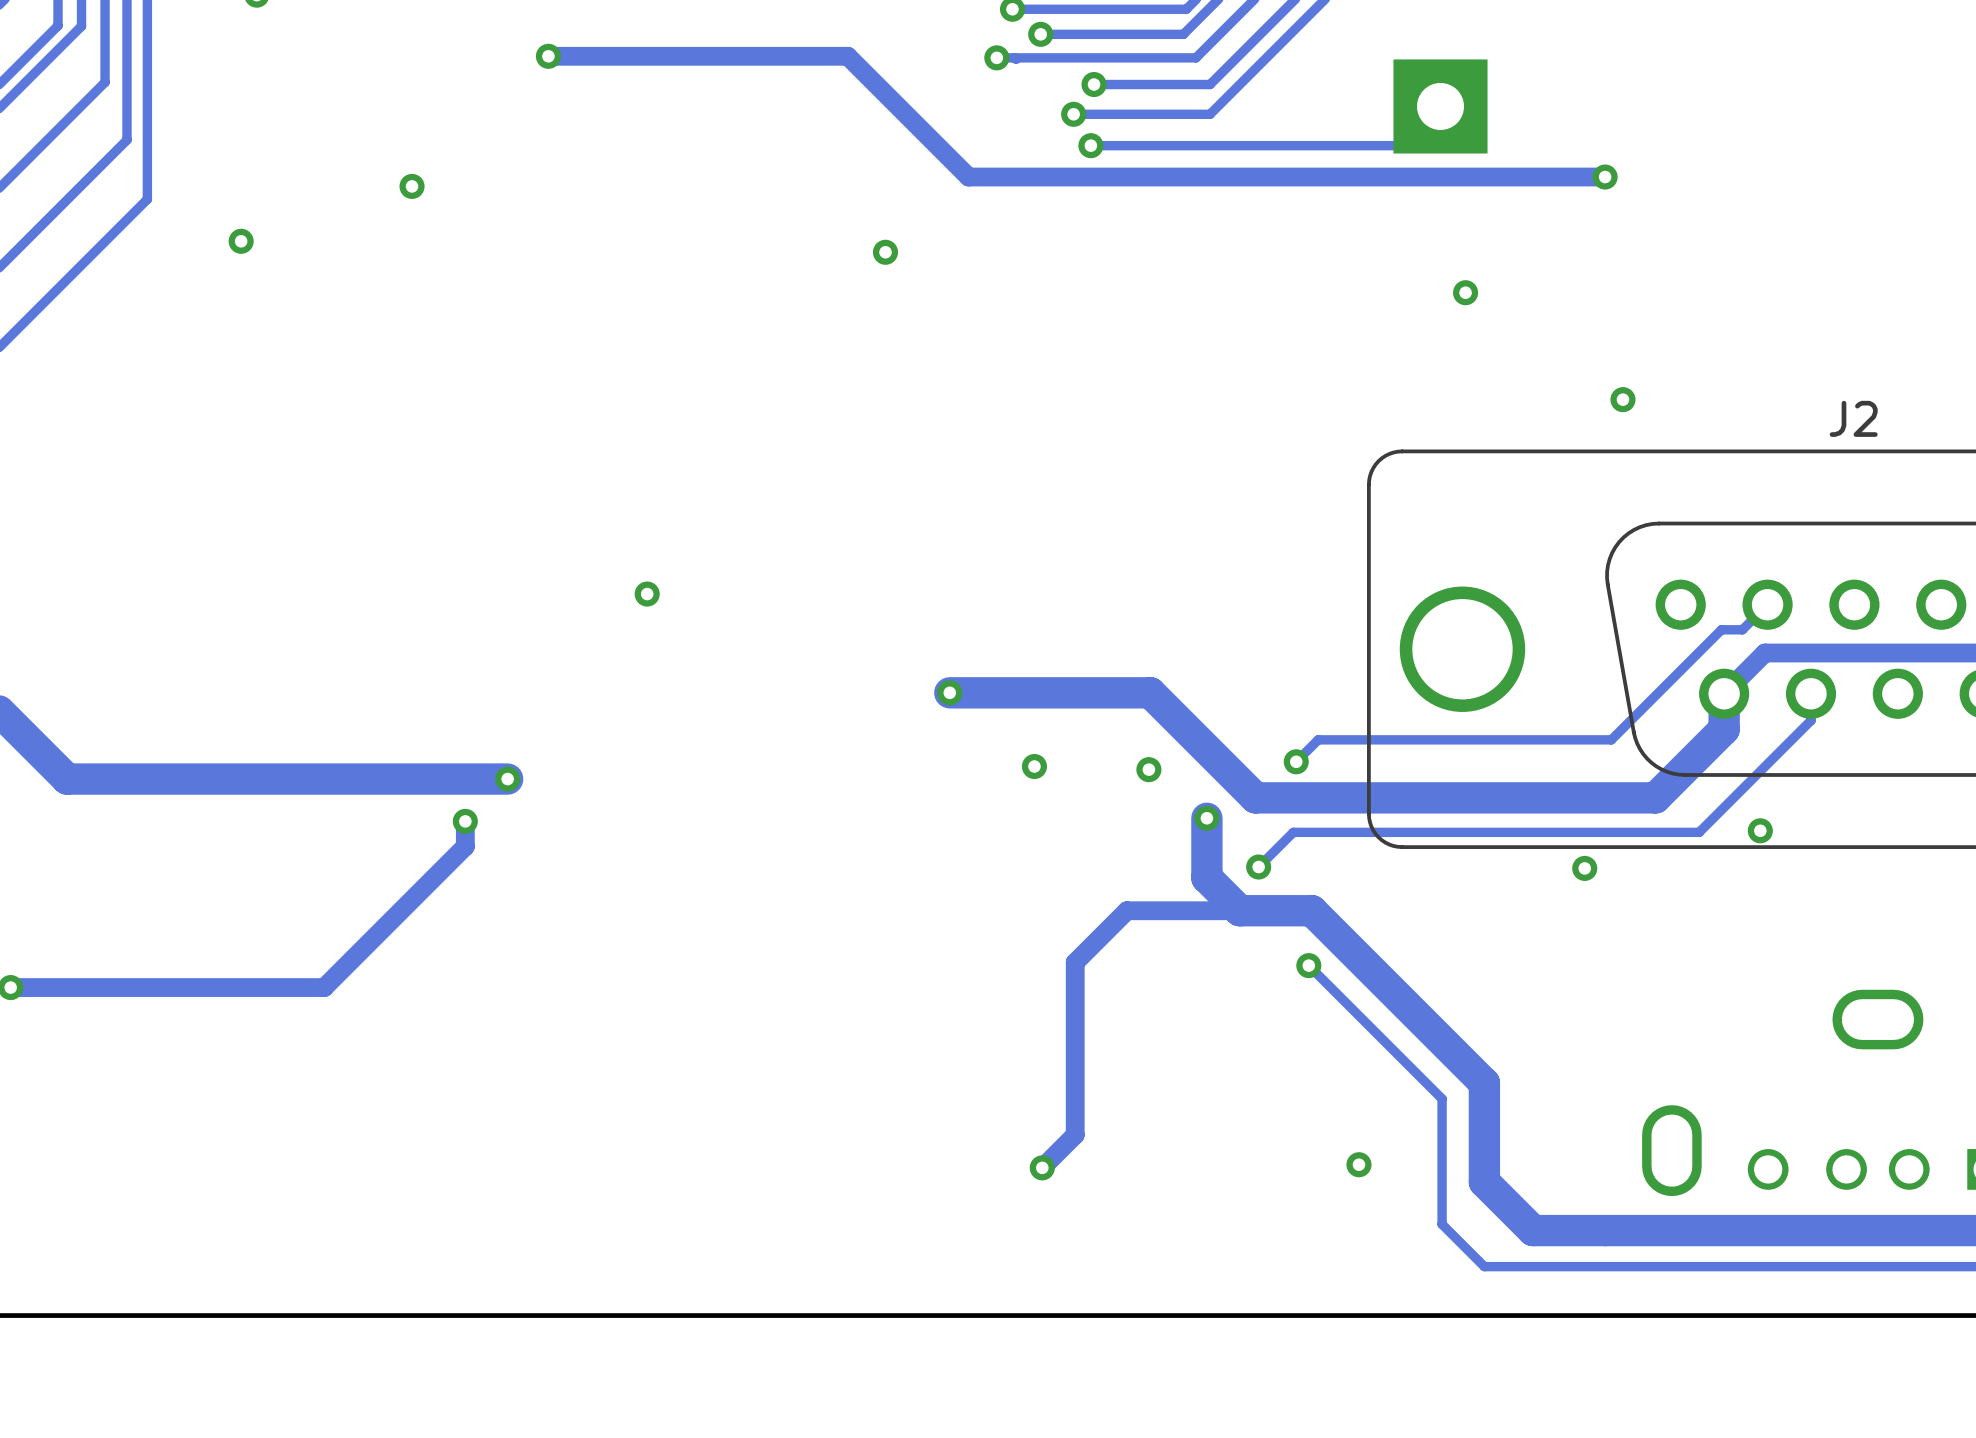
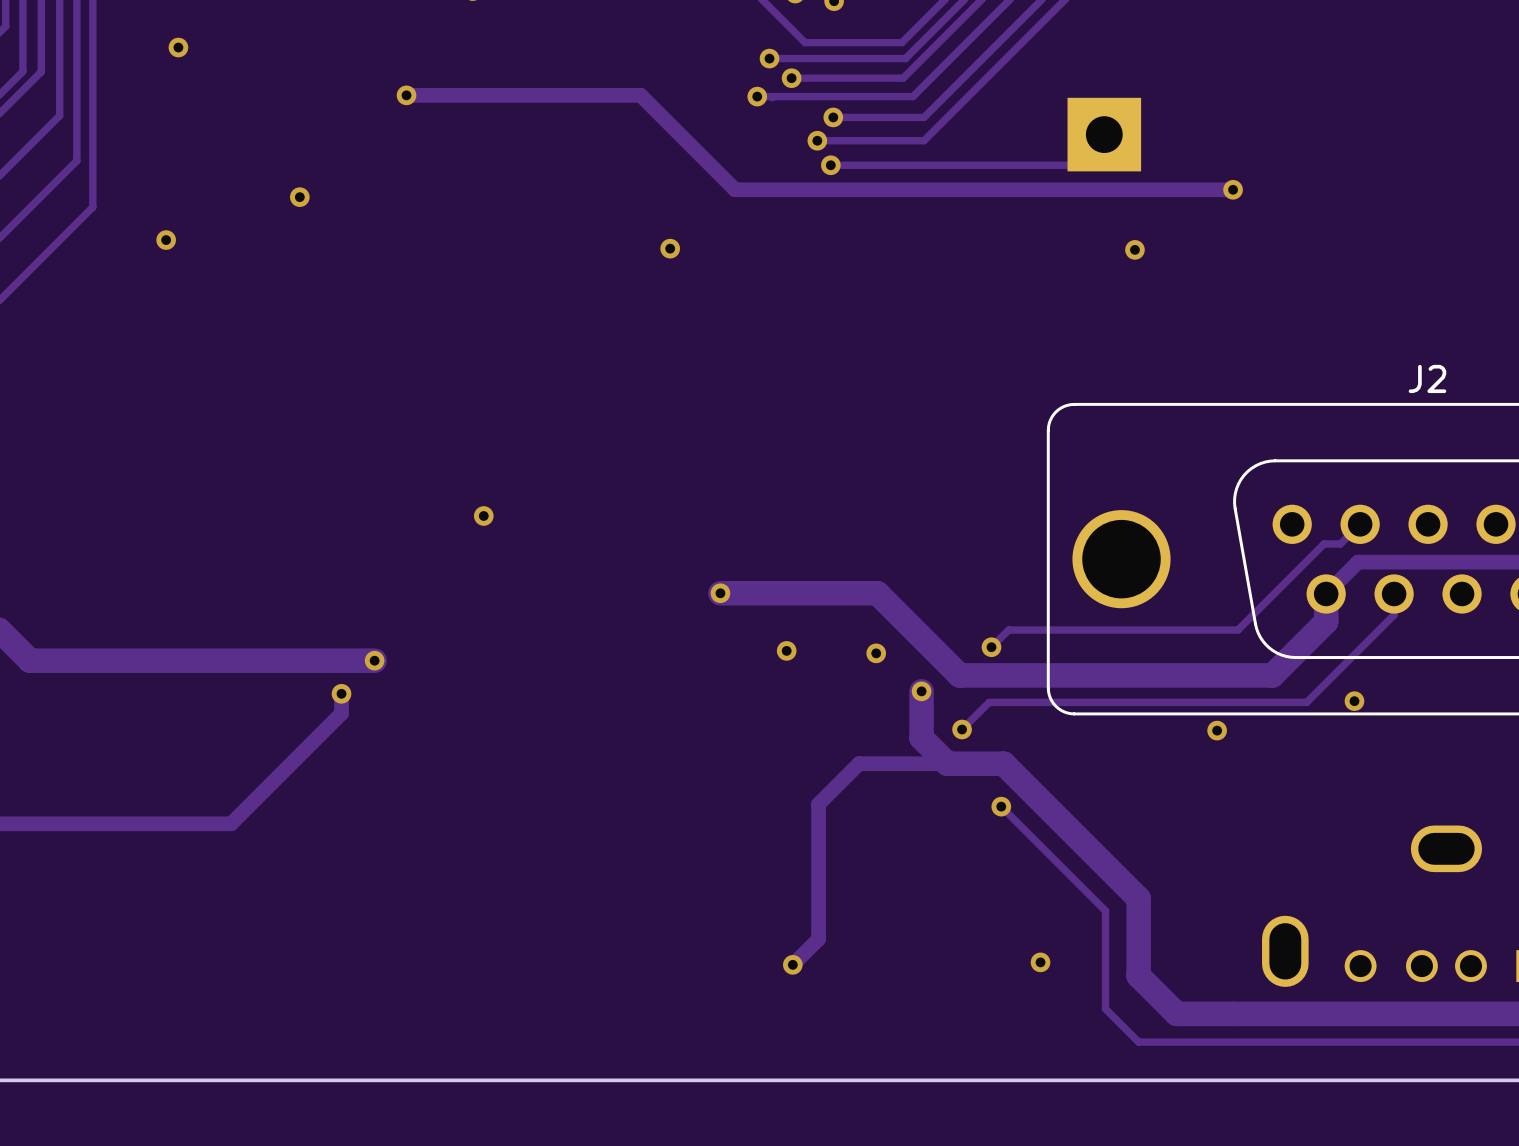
via position: (1465, 292) -> (1134, 249)
via: (1622, 399) -> none

